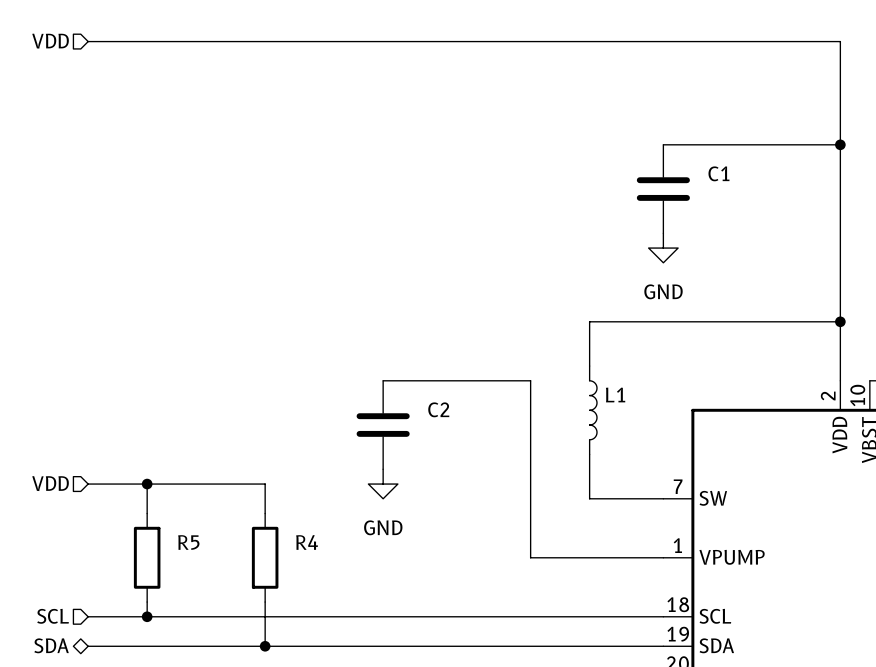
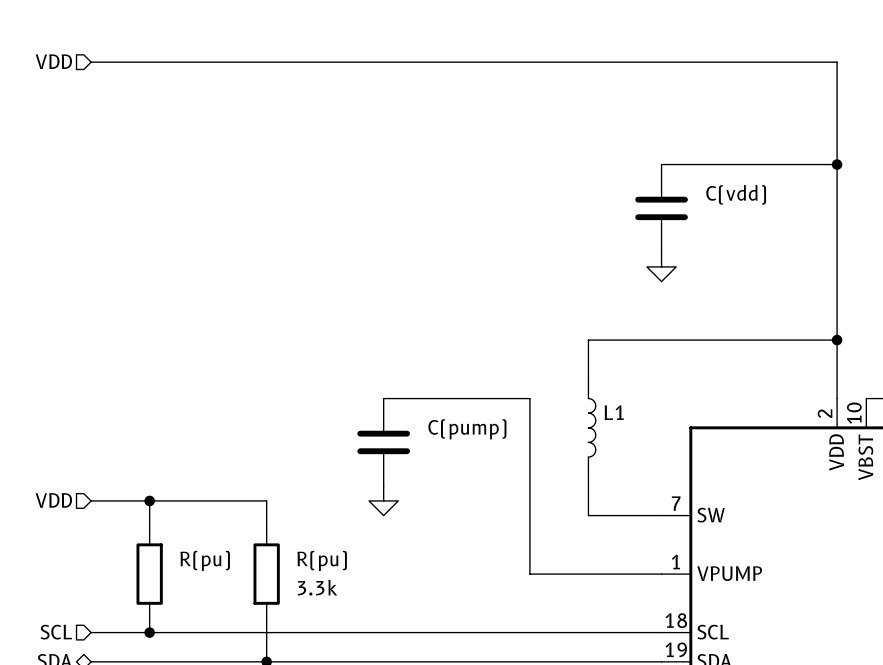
C1 name: C1 (718, 173) -> C(vdd) (736, 194)
power symbol text: GND (663, 291) -> none
C2 name: C2 (438, 409) -> C(pump) (467, 429)
power symbol text: GND (383, 527) -> none
R5 name: R5 (188, 542) -> R(pu) (205, 560)
R4 name: R4 (307, 542) -> R(pu) (322, 560)
R4 value: none -> 3.3k (317, 587)

